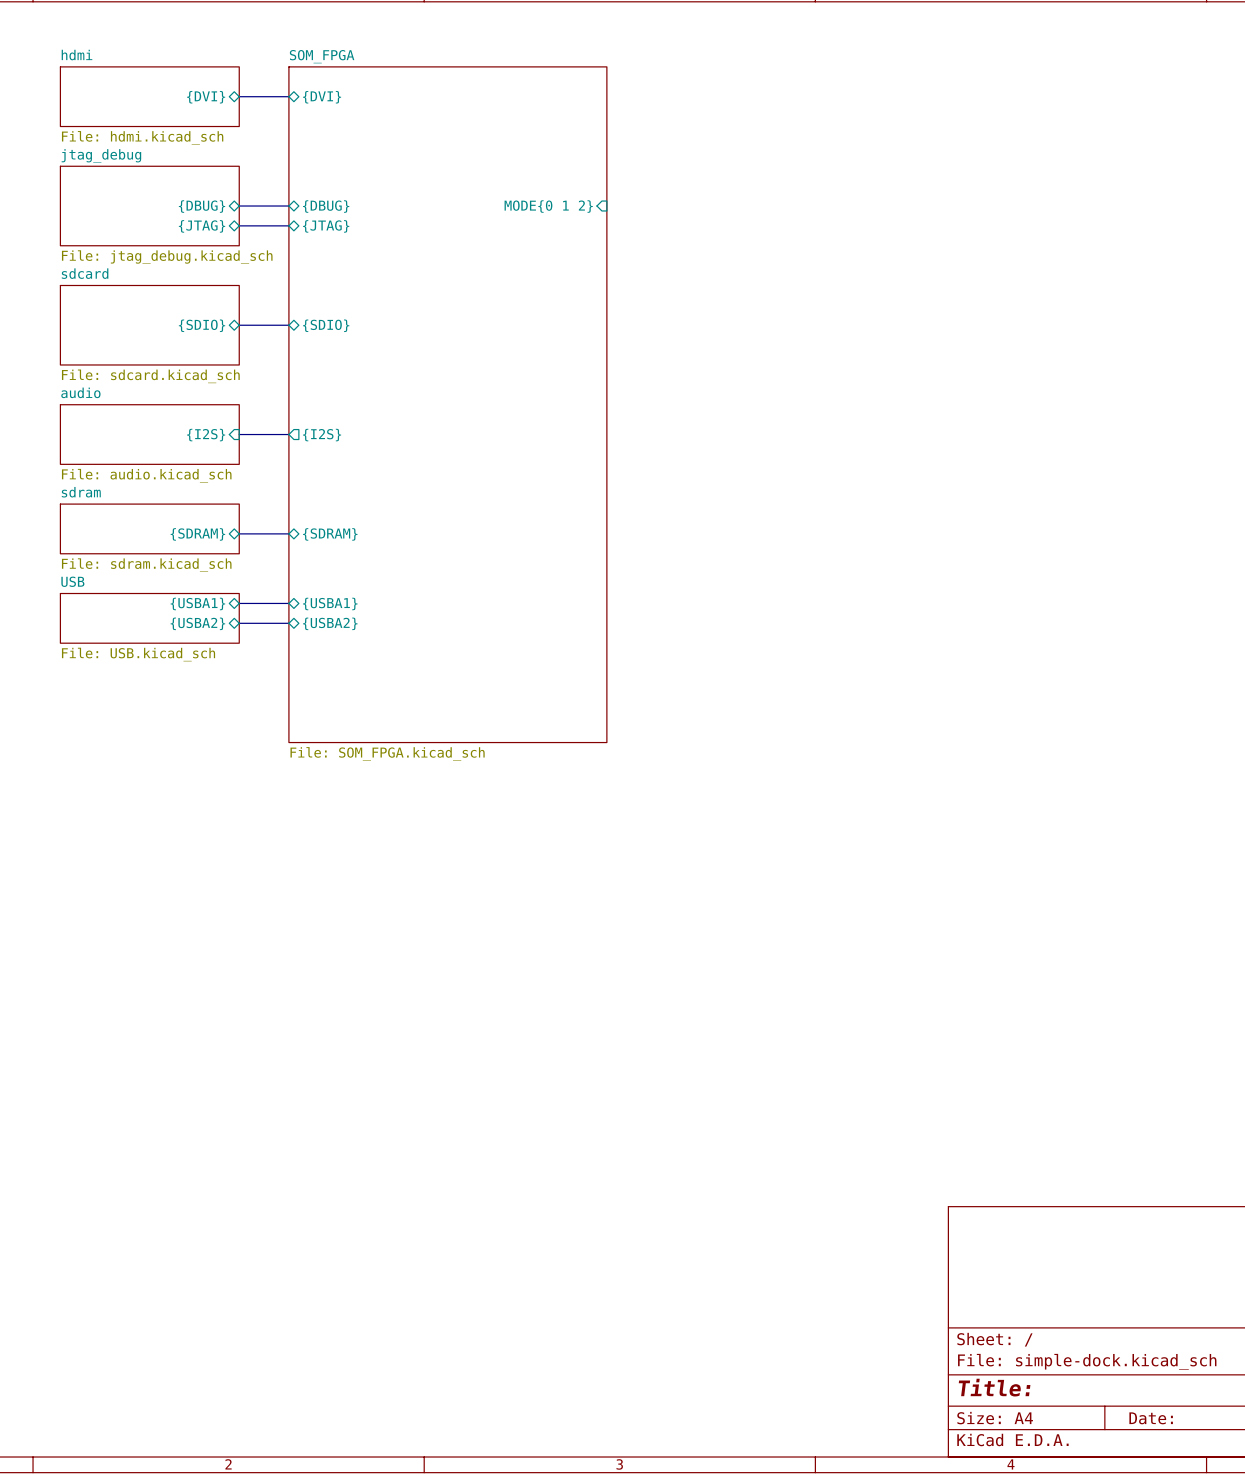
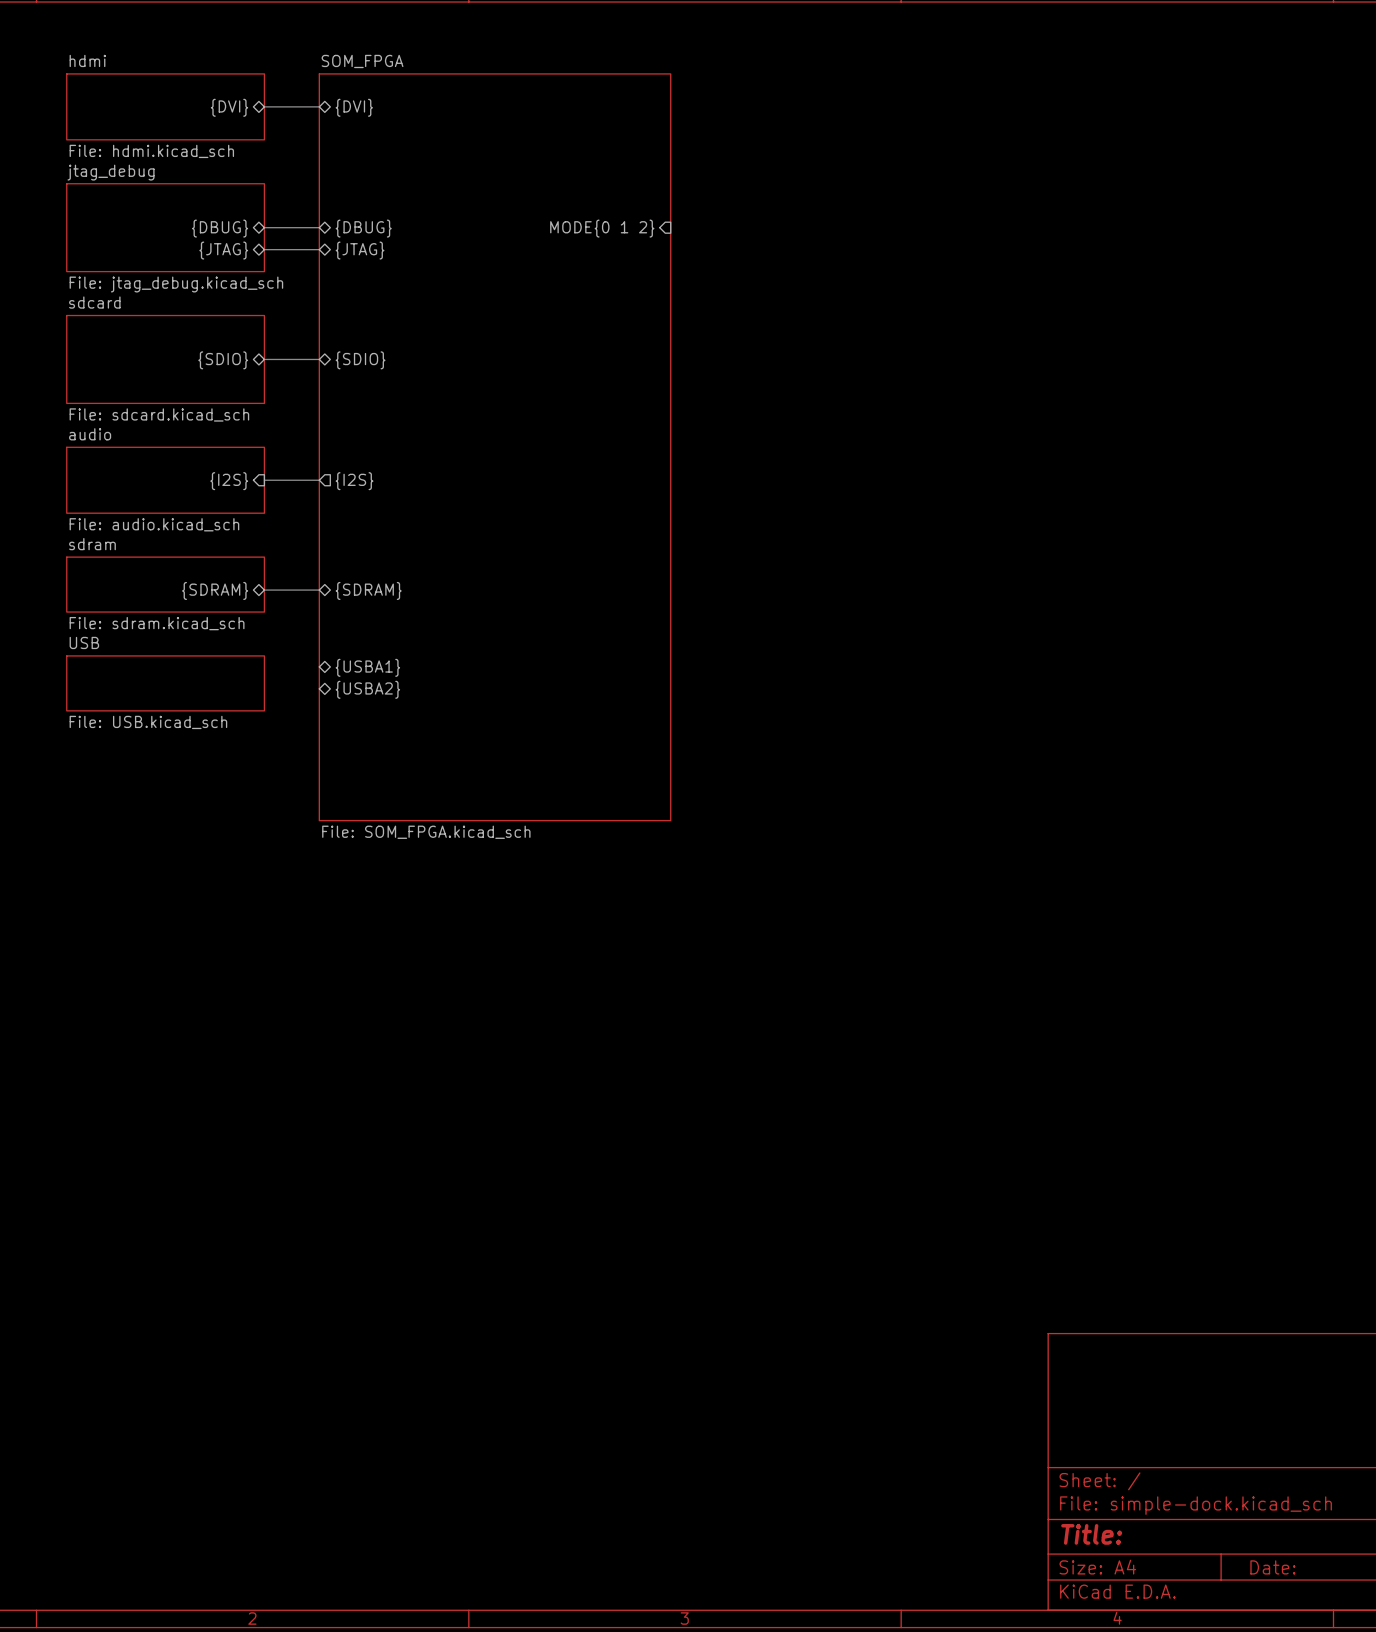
sheet pin: {USBA1} (197, 603) -> none
bus: (239, 603) (288, 603) -> none
sheet pin: {USBA2} (197, 623) -> none
bus: (239, 623) (288, 623) -> none

